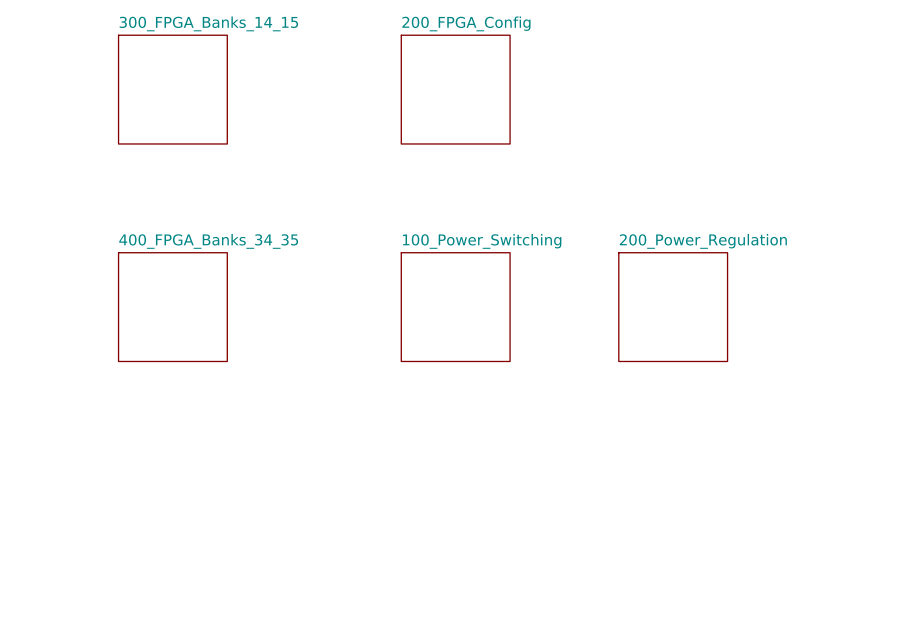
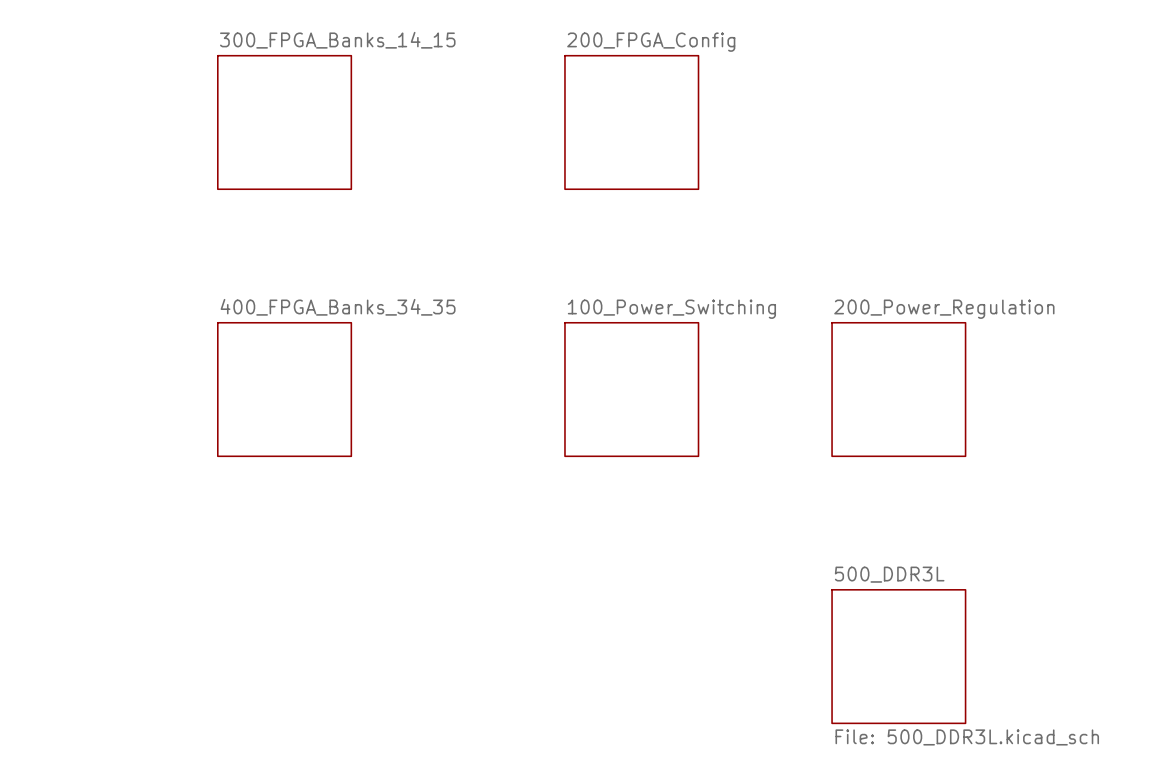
sheet 500_DDR3L: none -> File: 500_DDR3L.kicad_sch (898, 656)

